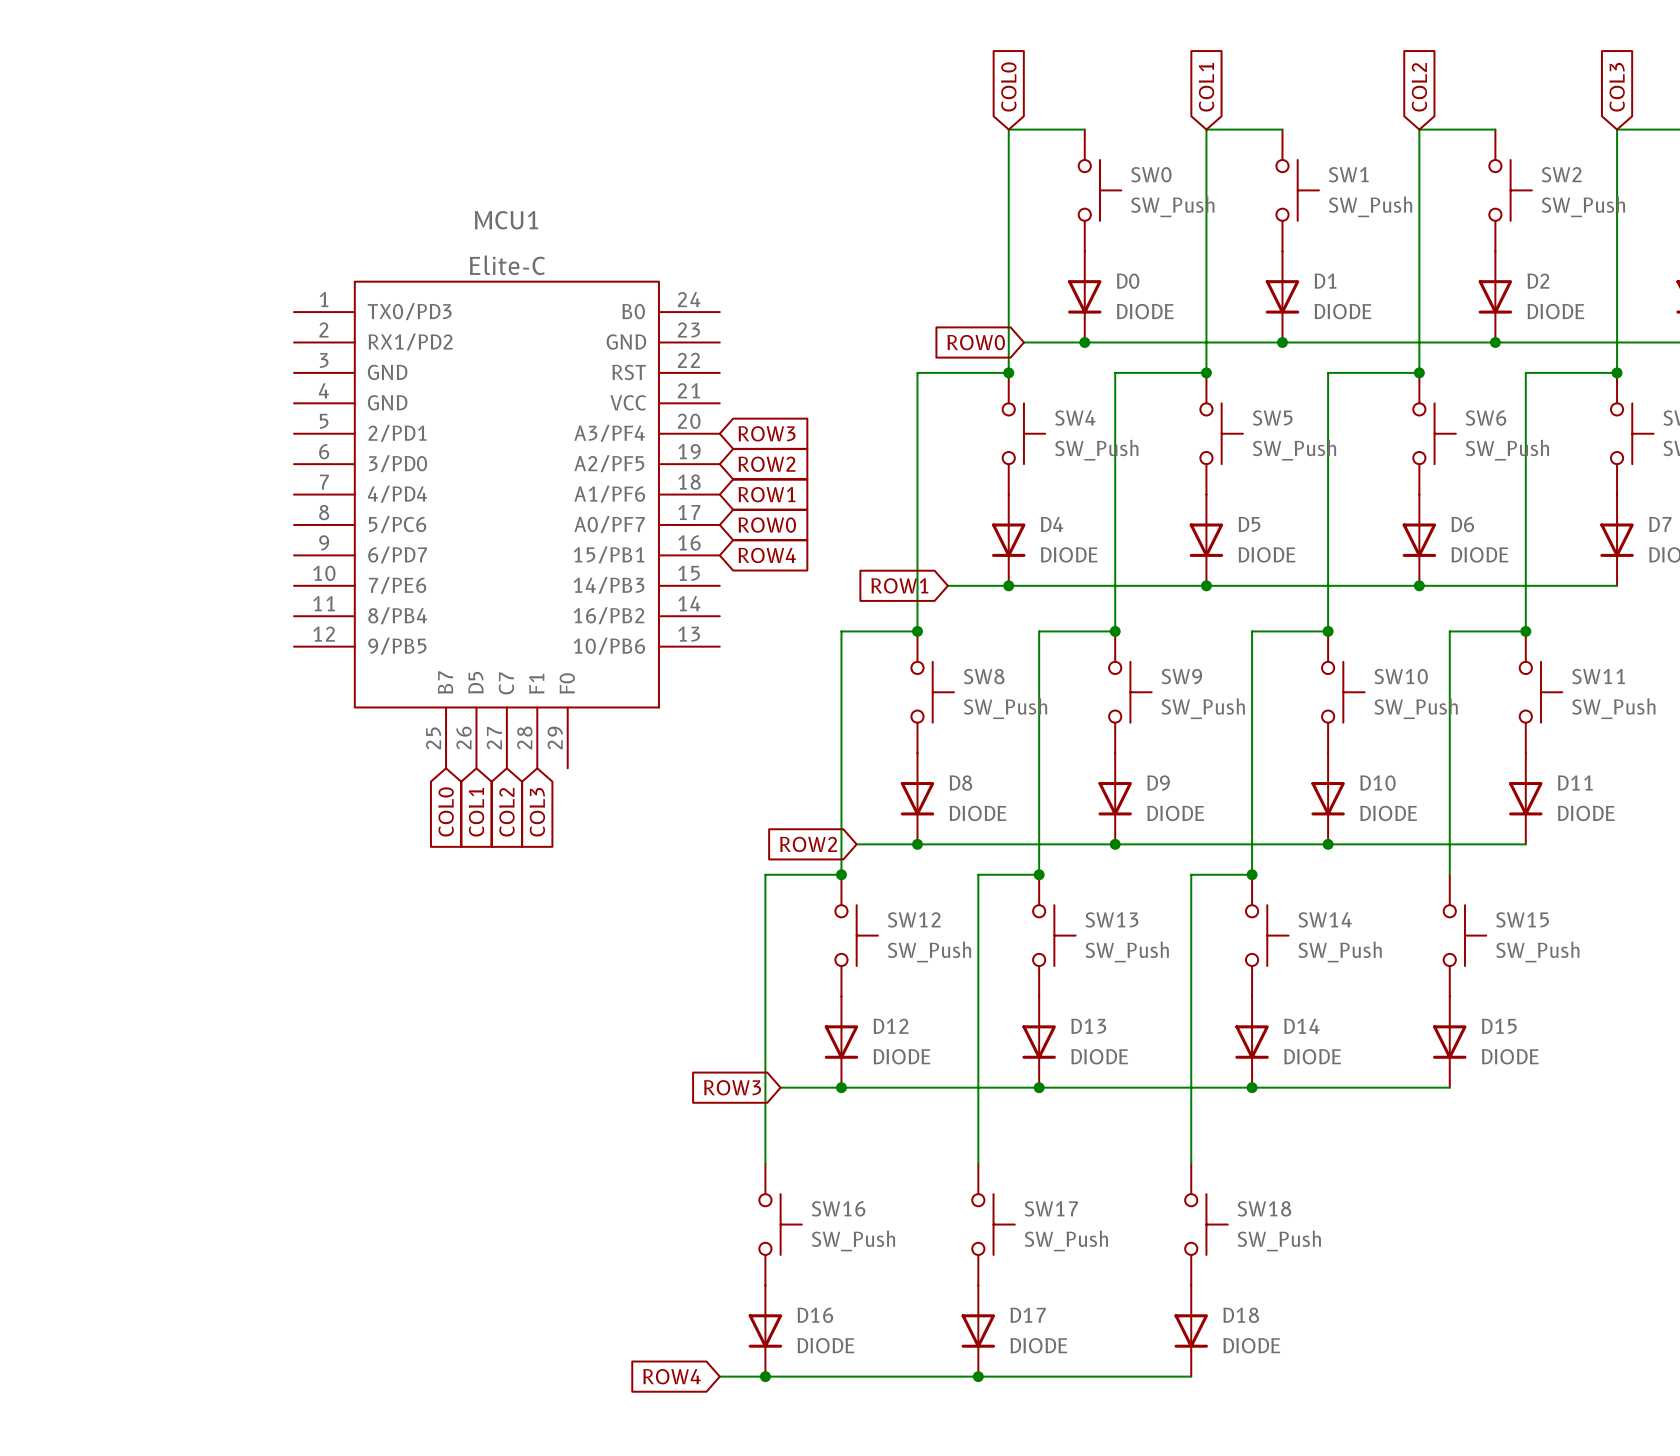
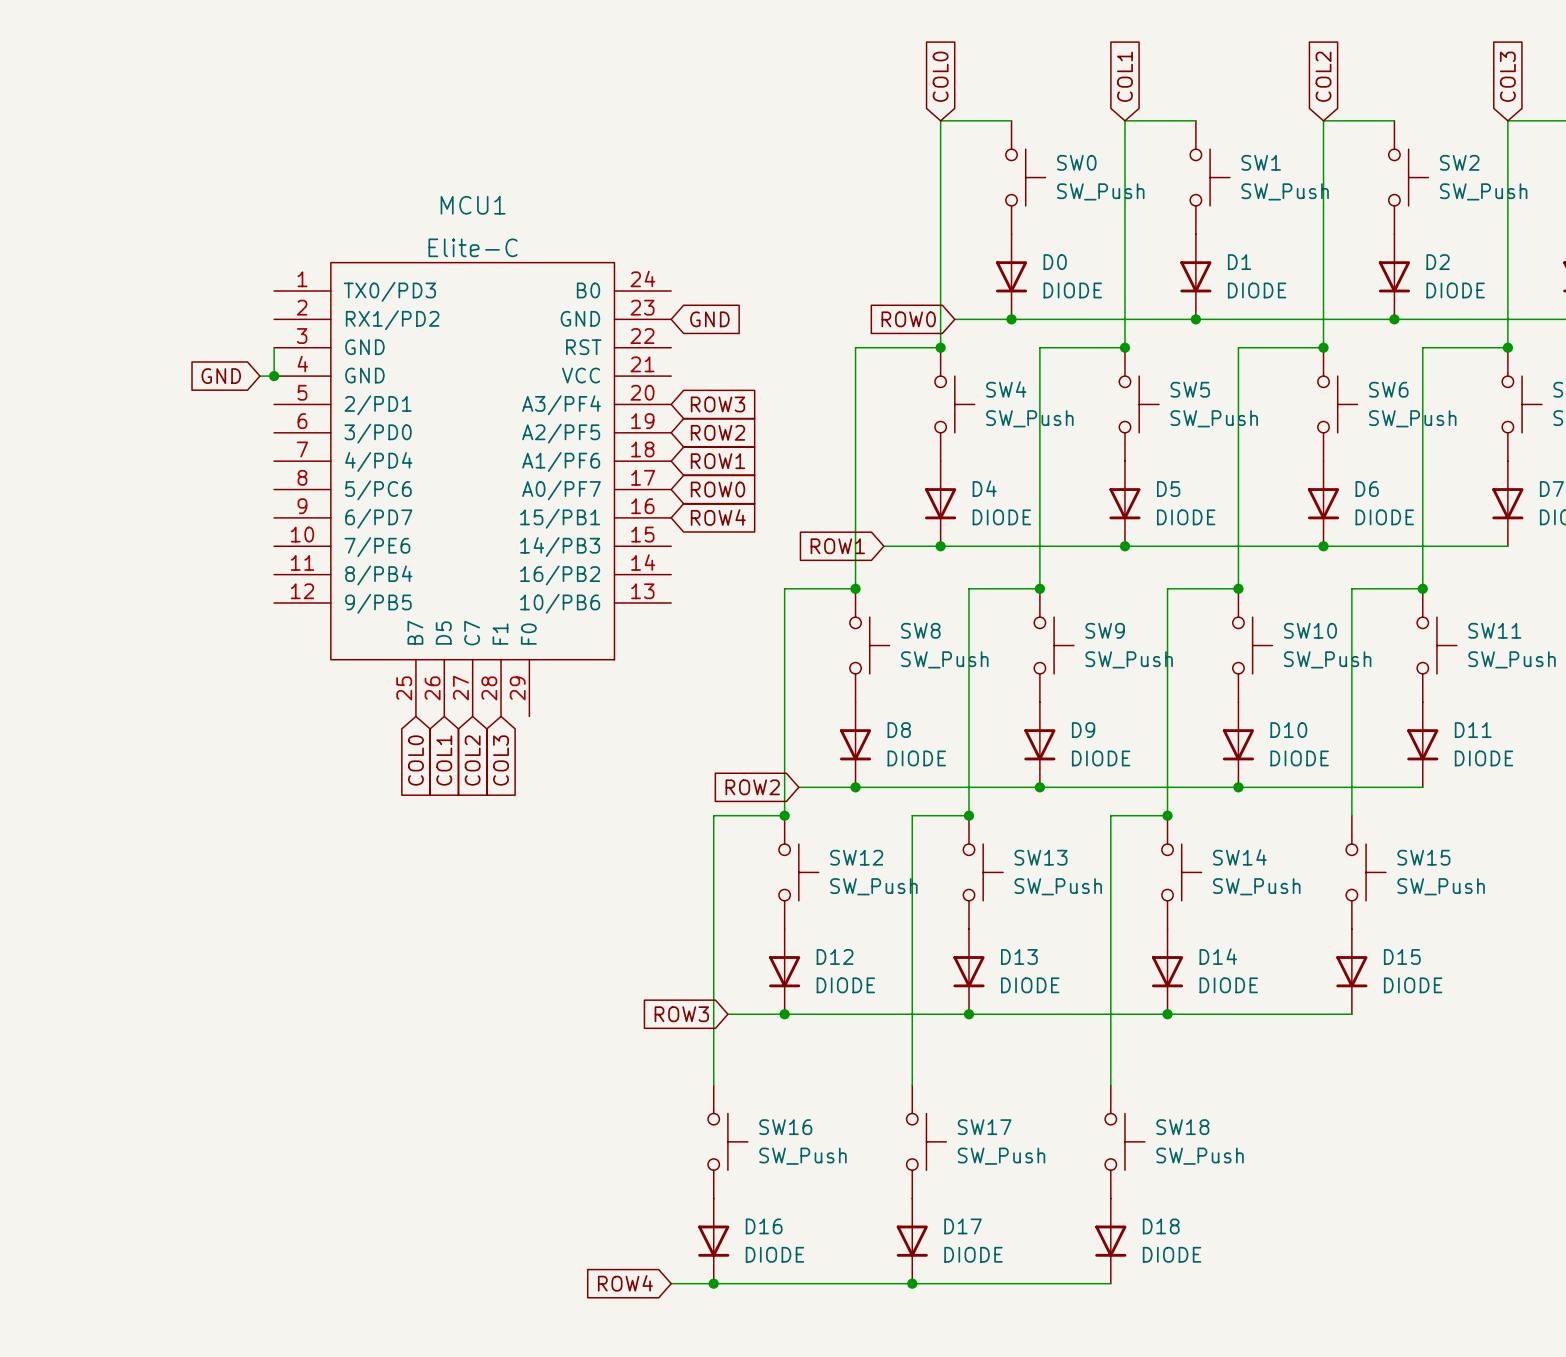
global label: none -> GND (709, 319)
wire: none -> (274, 347) (274, 376) (259, 376)
global label: none -> GND (221, 376)
junction: none -> (274, 376)

